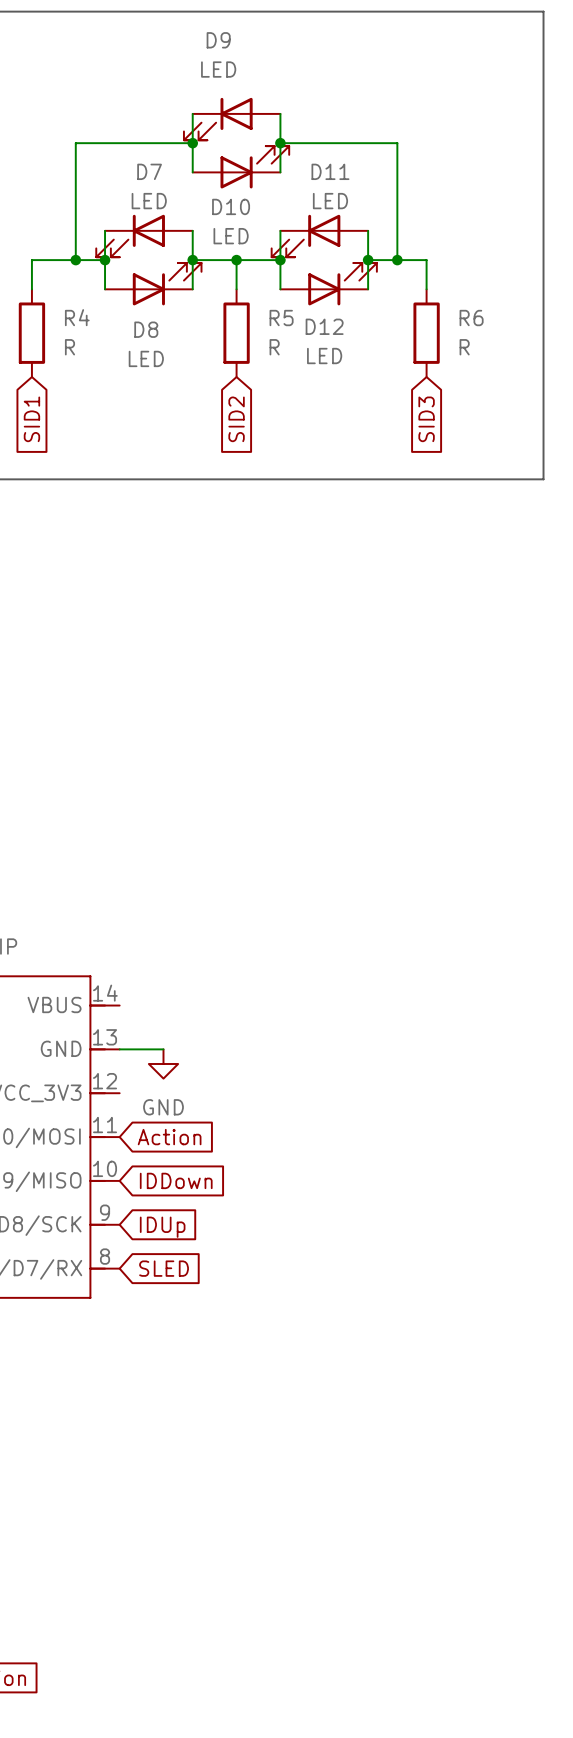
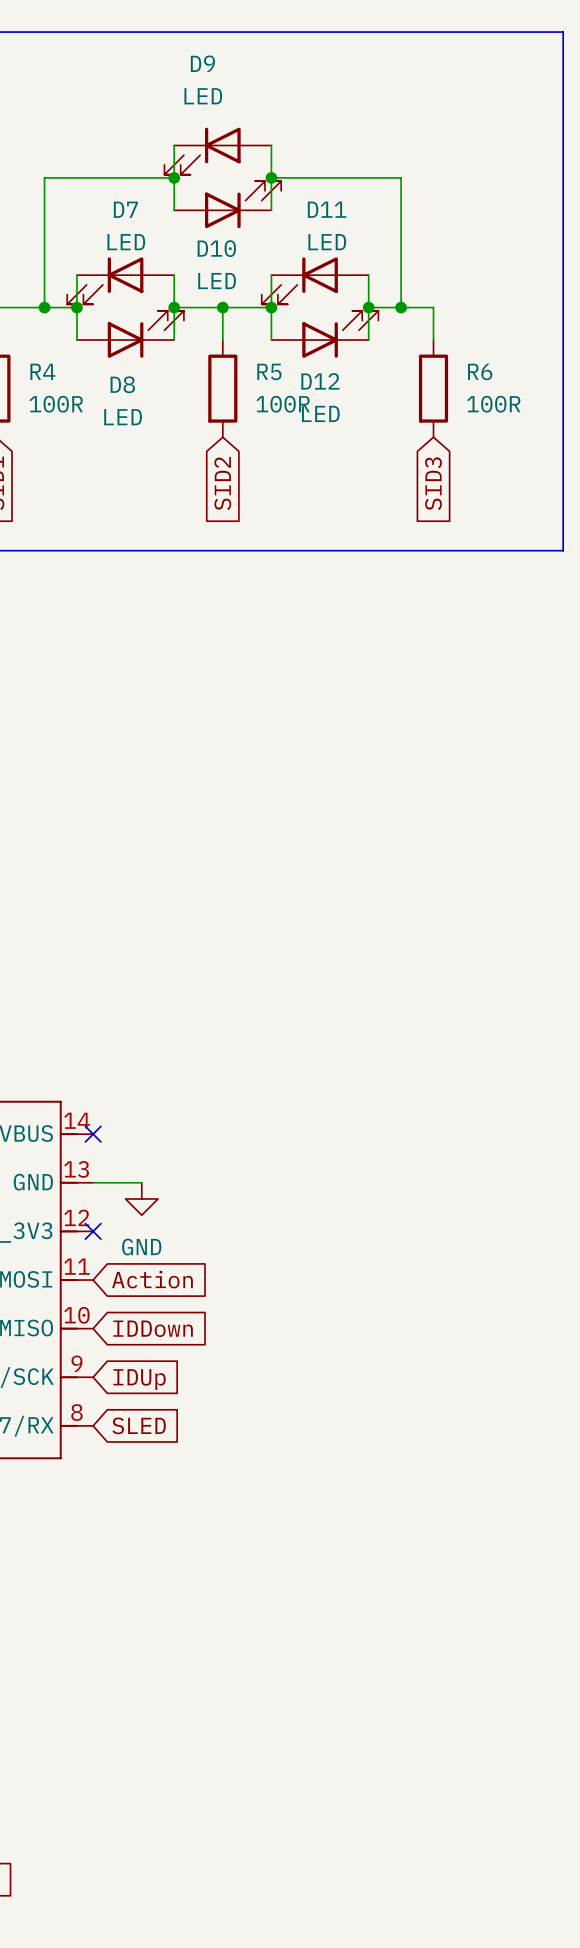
R4 value: R (69, 347) -> 100R (56, 404)
R5 value: R (274, 347) -> 100R (283, 404)
R6 value: R (464, 347) -> 100R (493, 404)
no-connect mark: none -> (93, 1134)
no-connect mark: none -> (93, 1231)

